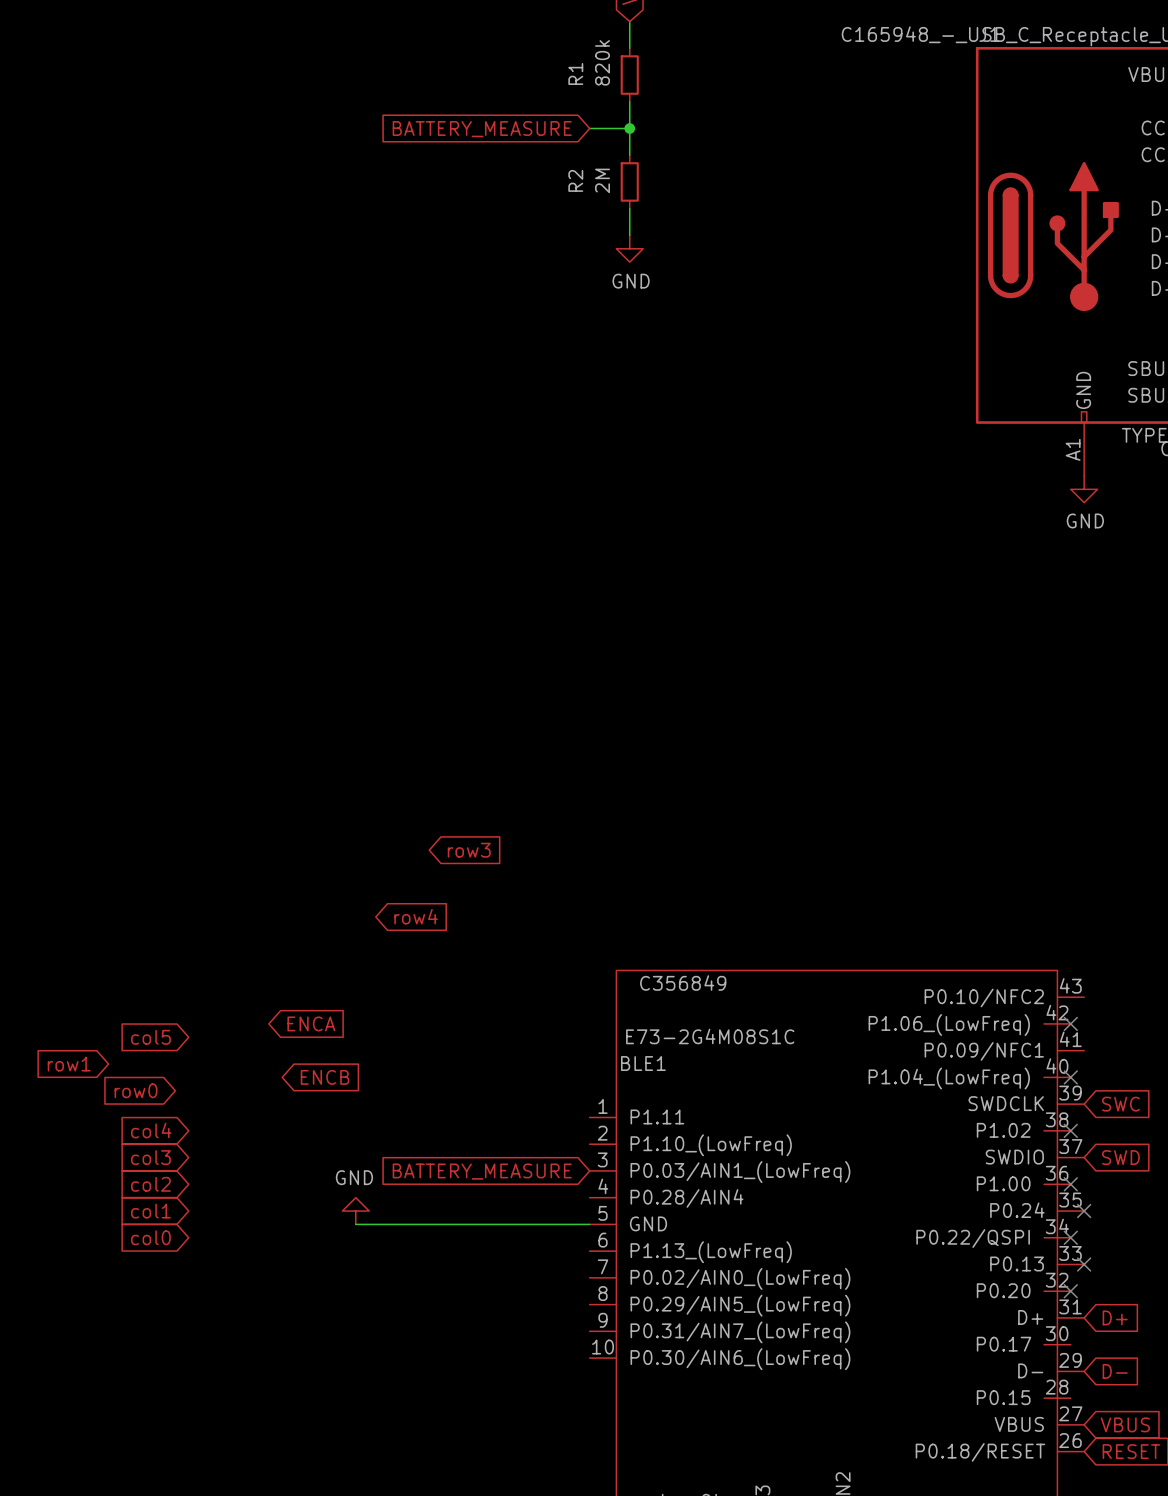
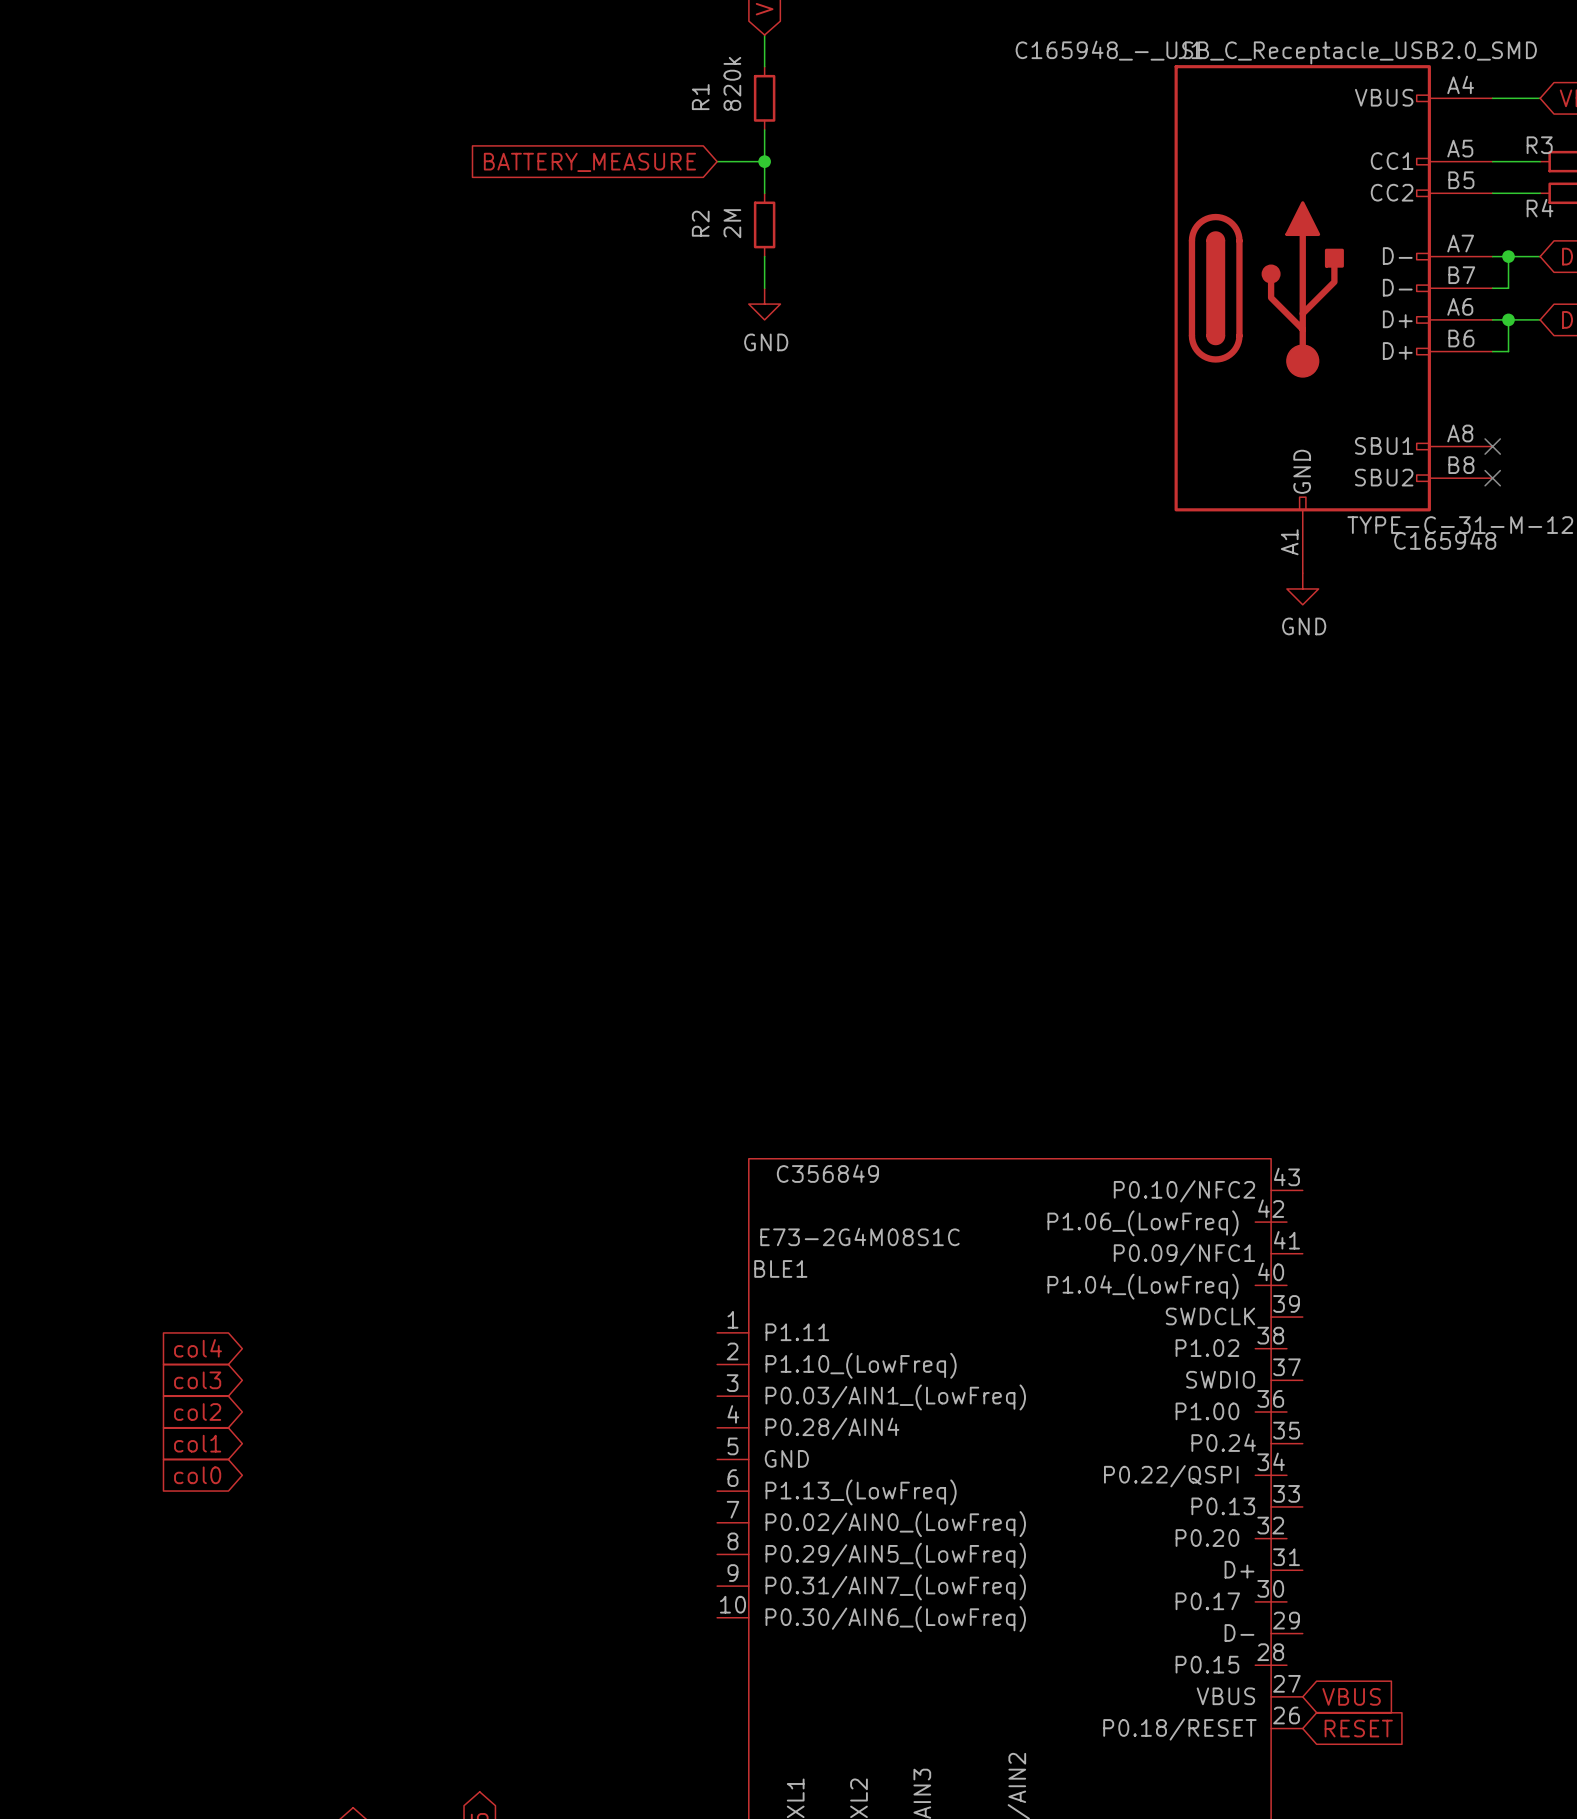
global label: row3 (469, 850) -> none
global label: row4 (416, 916) -> none
global label: ENCA (311, 1023) -> none
no-connect mark: (1070, 1023) -> none
global label: col5 (150, 1037) -> none
global label: row1 (69, 1064) -> none
global label: ENCB (325, 1077) -> none
no-connect mark: (1070, 1077) -> none
global label: row0 (136, 1090) -> none
global label: SWC (1120, 1104) -> none
no-connect mark: (1070, 1130) -> none
global label: SWD (1120, 1157) -> none
global label: BATTERY_MEASURE (482, 1171) -> none
no-connect mark: (1070, 1184) -> none
power symbol: GND (355, 1211) -> none
no-connect mark: (1084, 1211) -> none
wire: (355, 1224) (589, 1224) -> none
no-connect mark: (1070, 1237) -> none
no-connect mark: (1084, 1264) -> none
no-connect mark: (1070, 1291) -> none
global label: D+ (1115, 1317) -> none
global label: D- (1115, 1371) -> none

